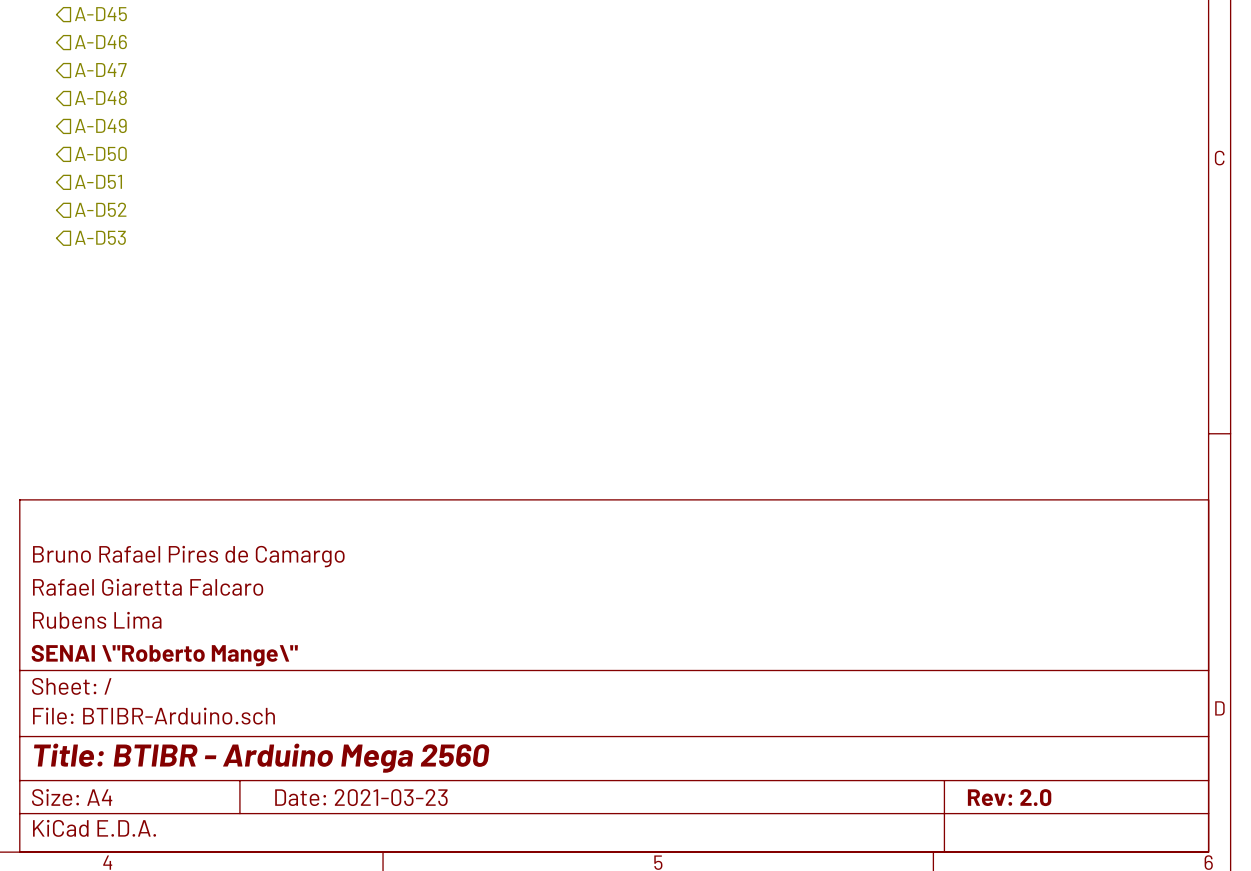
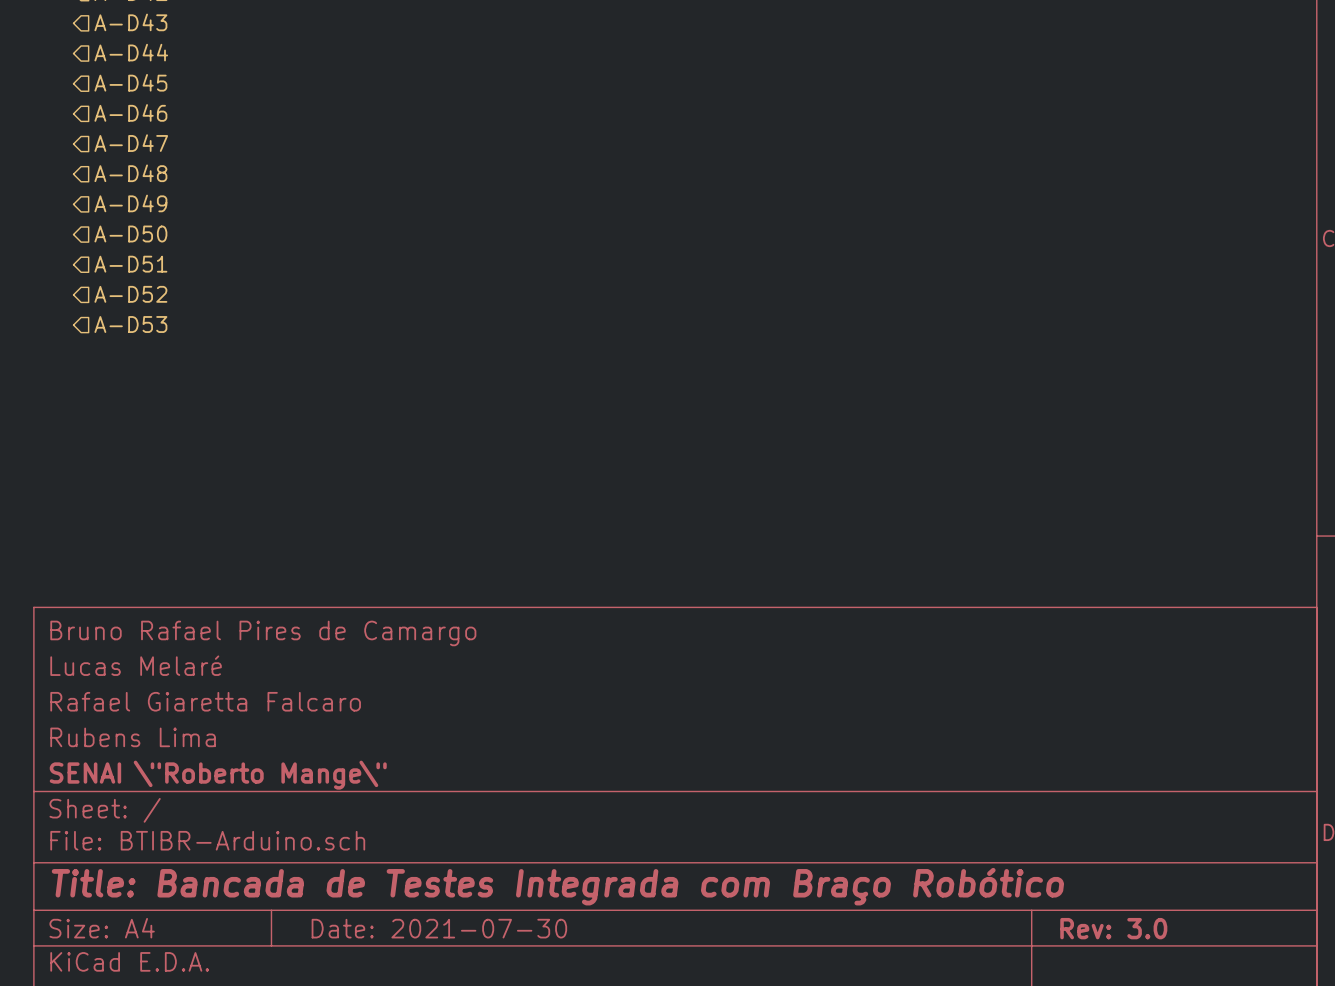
title block: none -> Bruno Rafael Pires de Camargo (263, 633)
title block: Bruno Rafael Pires de Camargo (188, 556) -> Lucas Melaré (136, 665)
title block: Title: BTIBR - Arduino Mega 2560 (261, 758) -> Title: Bancada de Testes Integrada com Braço Robótico (557, 886)
title block: Date: 2021-03-23 (361, 797) -> Date: 2021-07-30 (439, 928)
title block: Rev: 2.0 (1009, 797) -> Rev: 3.0 (1113, 928)

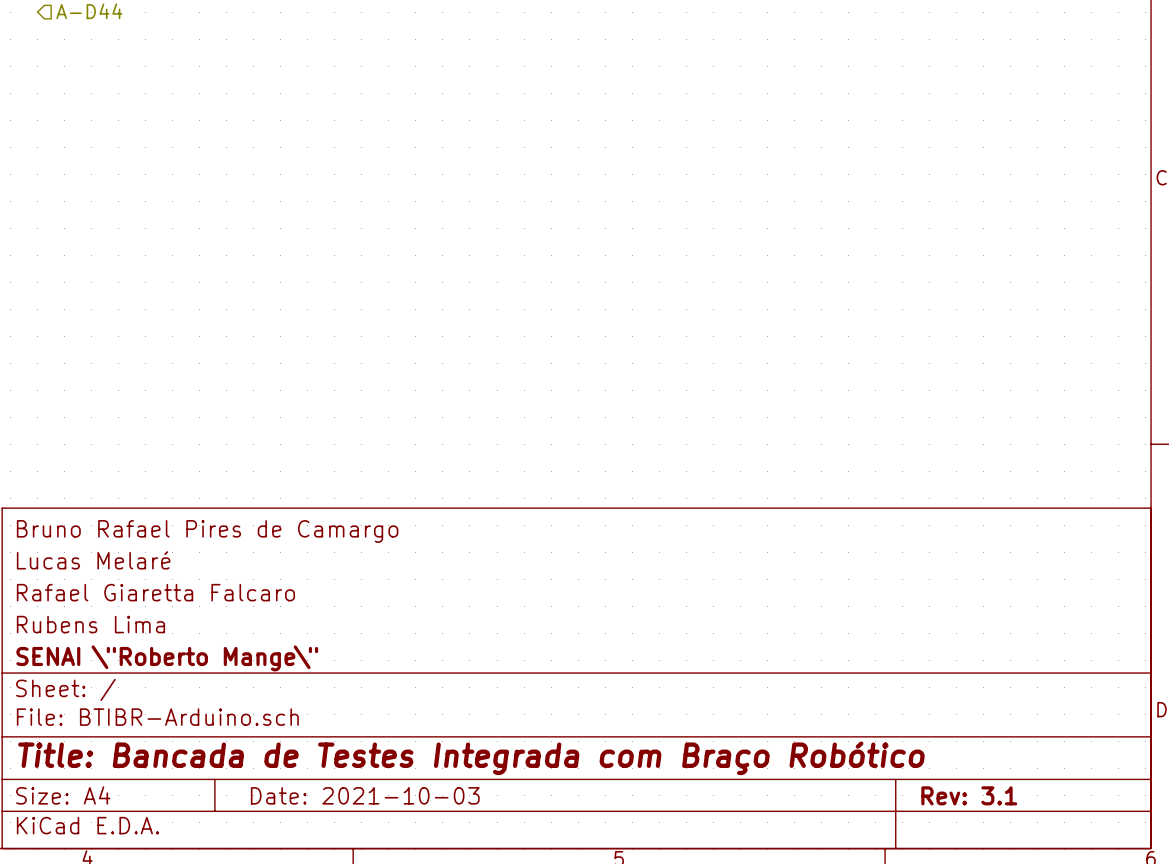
hierarchical label: A-D45 (130, 82) -> none
hierarchical label: A-D46 (130, 112) -> none
hierarchical label: A-D47 (131, 143) -> none
hierarchical label: A-D48 (130, 173) -> none
hierarchical label: A-D49 (130, 203) -> none
hierarchical label: A-D50 (130, 233) -> none
hierarchical label: A-D51 (130, 264) -> none
hierarchical label: A-D52 (130, 294) -> none
hierarchical label: A-D53 (130, 324) -> none
title block: Date: 2021-07-30 (439, 928) -> Date: 2021-10-03 (365, 795)
title block: Rev: 3.0 (1113, 928) -> Rev: 3.1 (969, 795)

